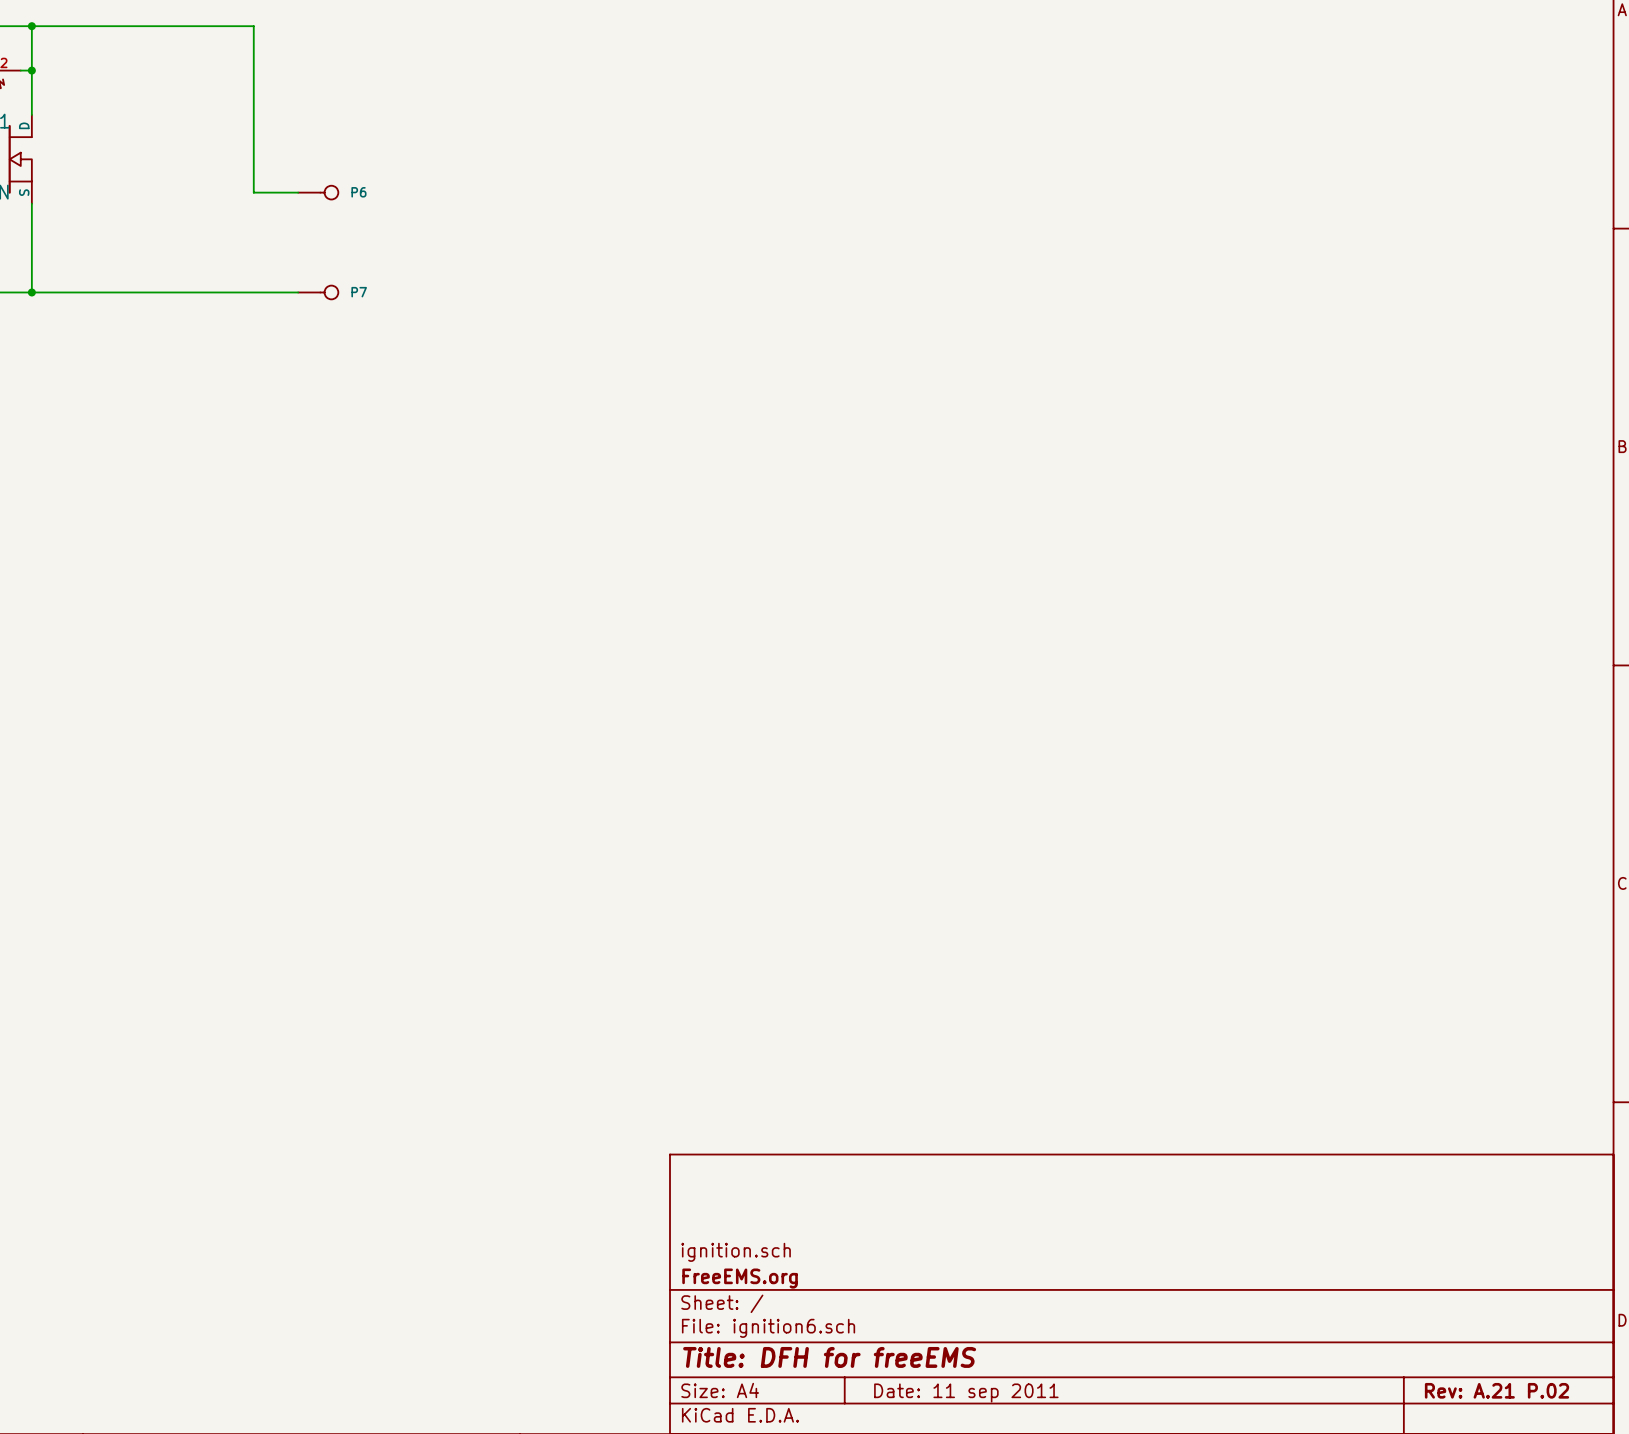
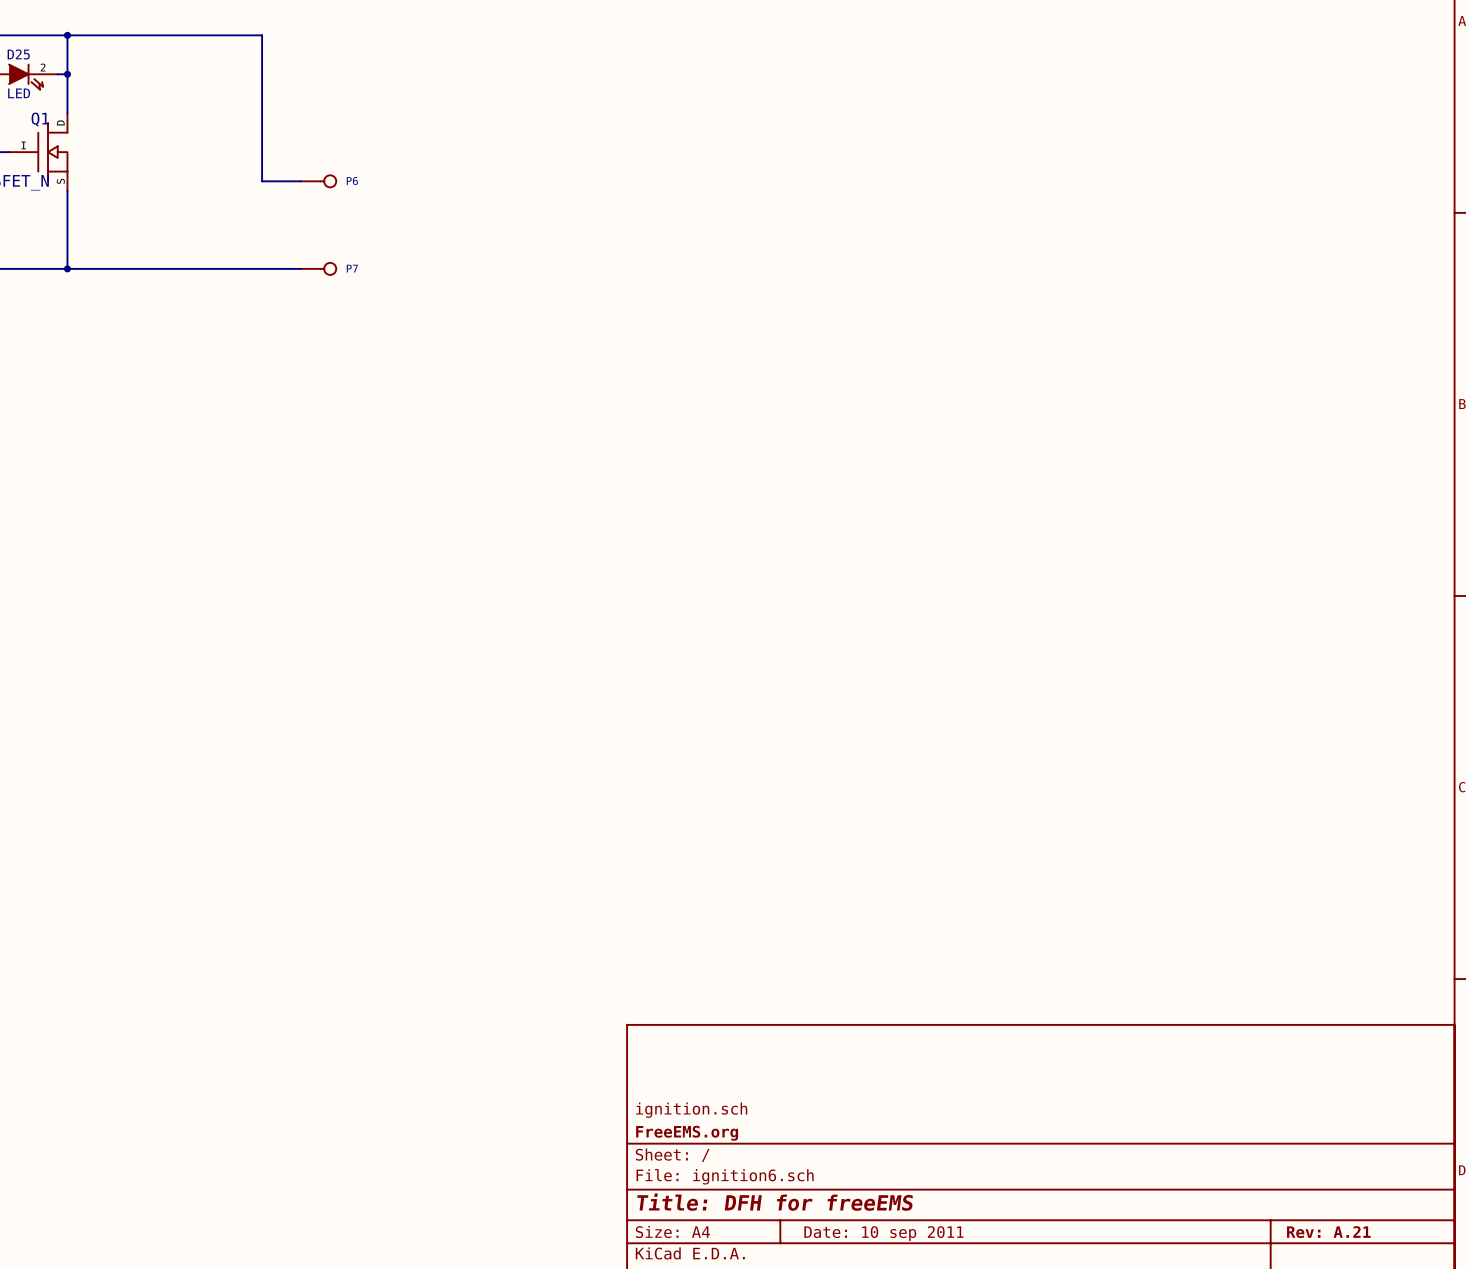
title block: Rev: A.21 P.02 (1497, 1390) -> Rev: A.21 (1328, 1232)
title block: Date: 11 sep 2011 (966, 1392) -> Date: 10 sep 2011 (883, 1233)

